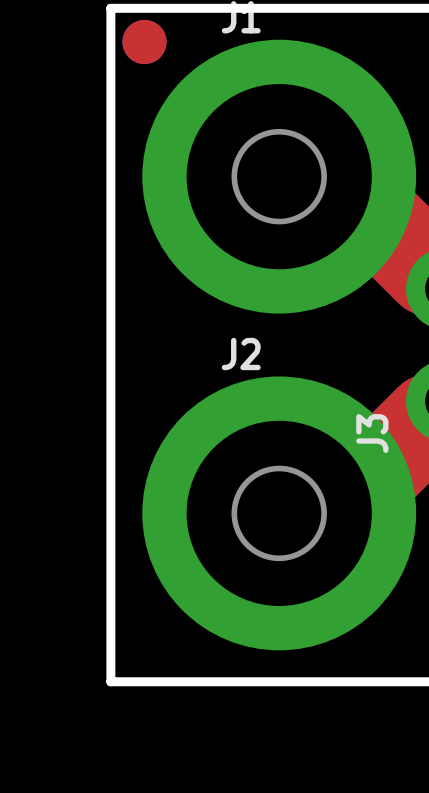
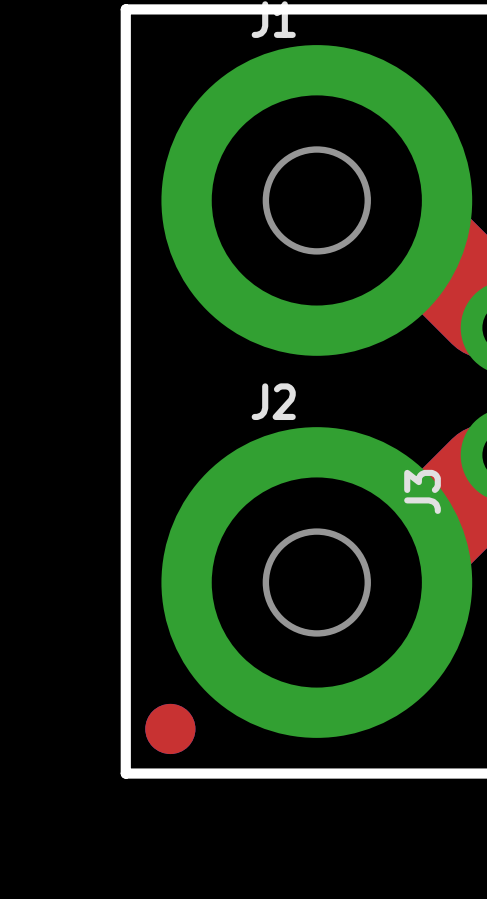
part position: (144, 41) -> (170, 728)

